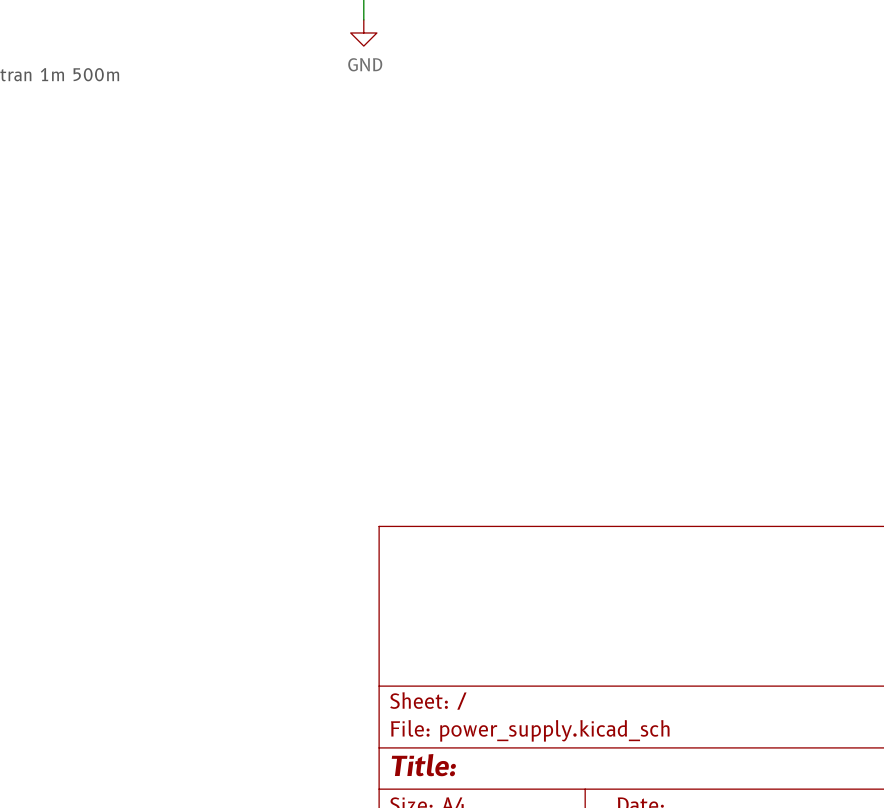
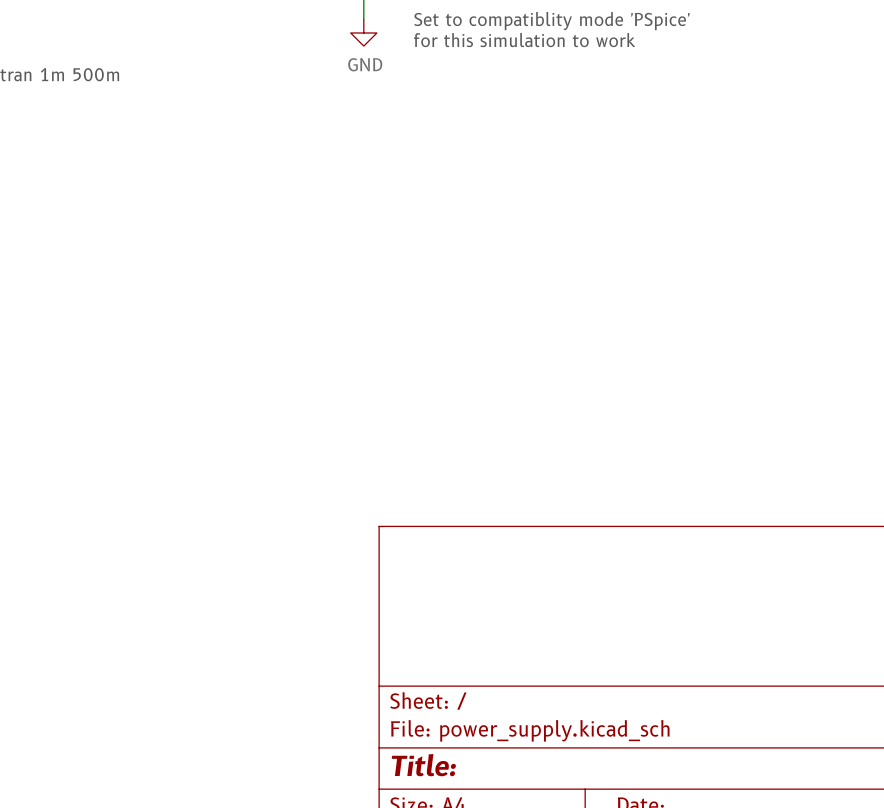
text: none -> Set to compatiblity mode 'PSpice' (551, 21)
text: none -> for this simulation to work (524, 40)

